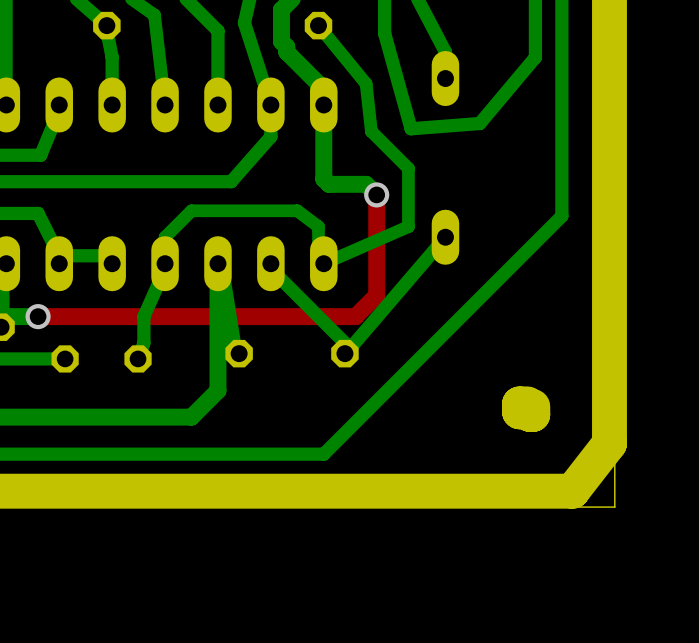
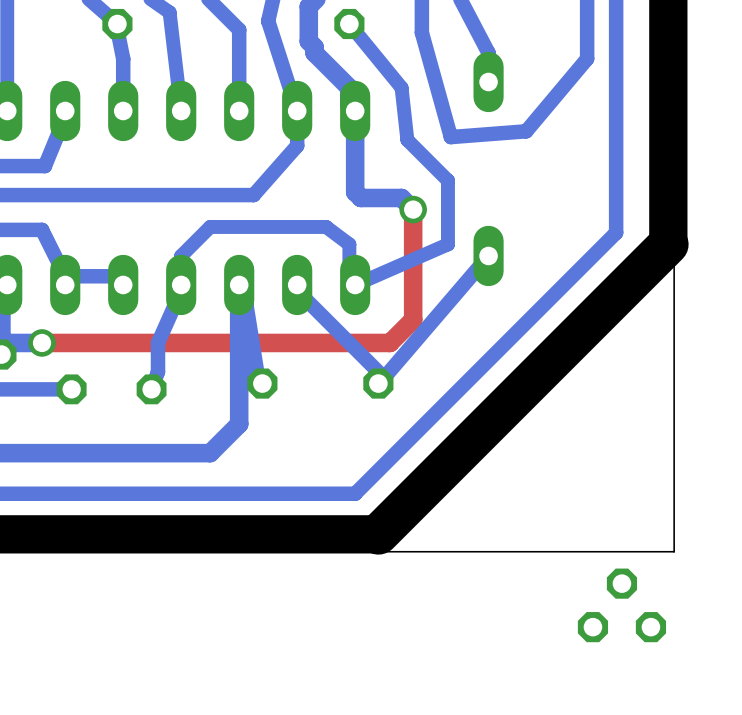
board edge: (609, 226) (609, 443) (572, 491) (344, 491) -> (668, 244) (378, 534)
board edge: (527, 403) (519, 403) (519, 411) (530, 411) (530, 414) (532, 414) (532, 406) -> none
part: none -> (621, 605)

